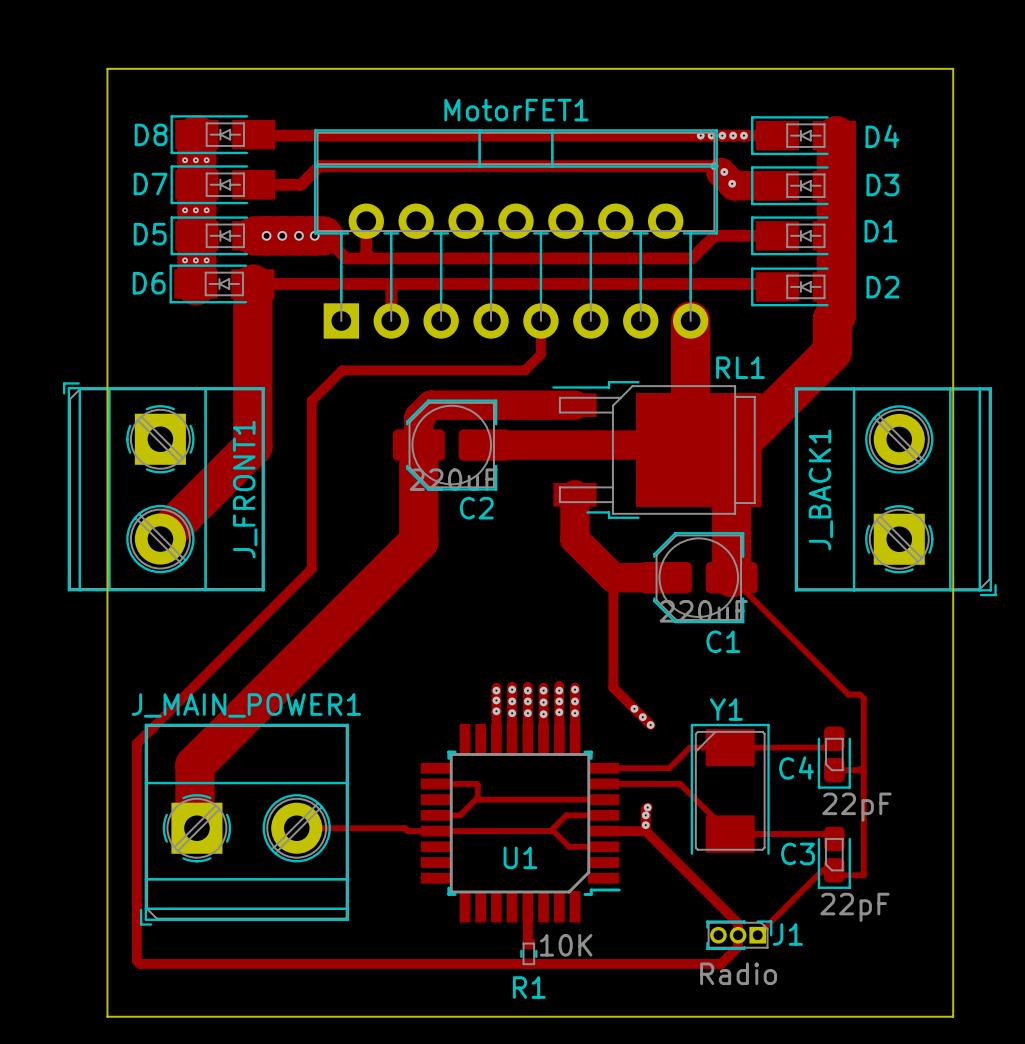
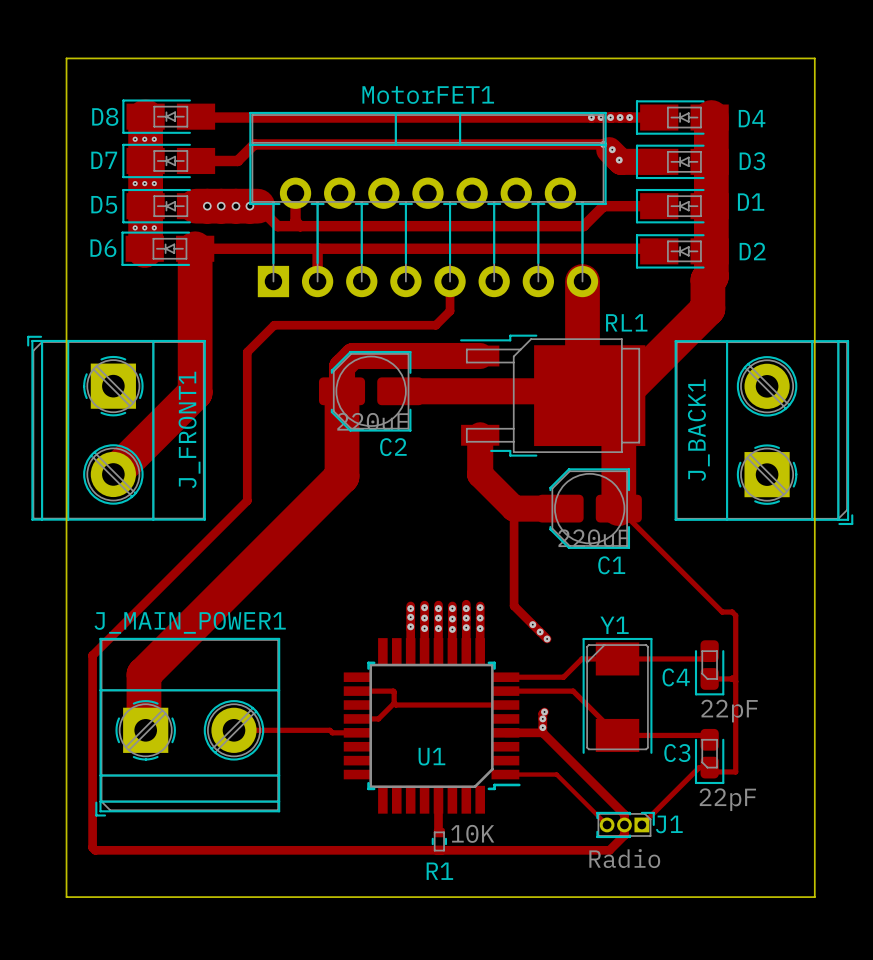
track: (603, 815) (566, 815) (550, 831) (436, 831) -> none
track: (554, 832) (569, 846) (603, 846) -> none
track: none -> (505, 774) (556, 774) (607, 824)

